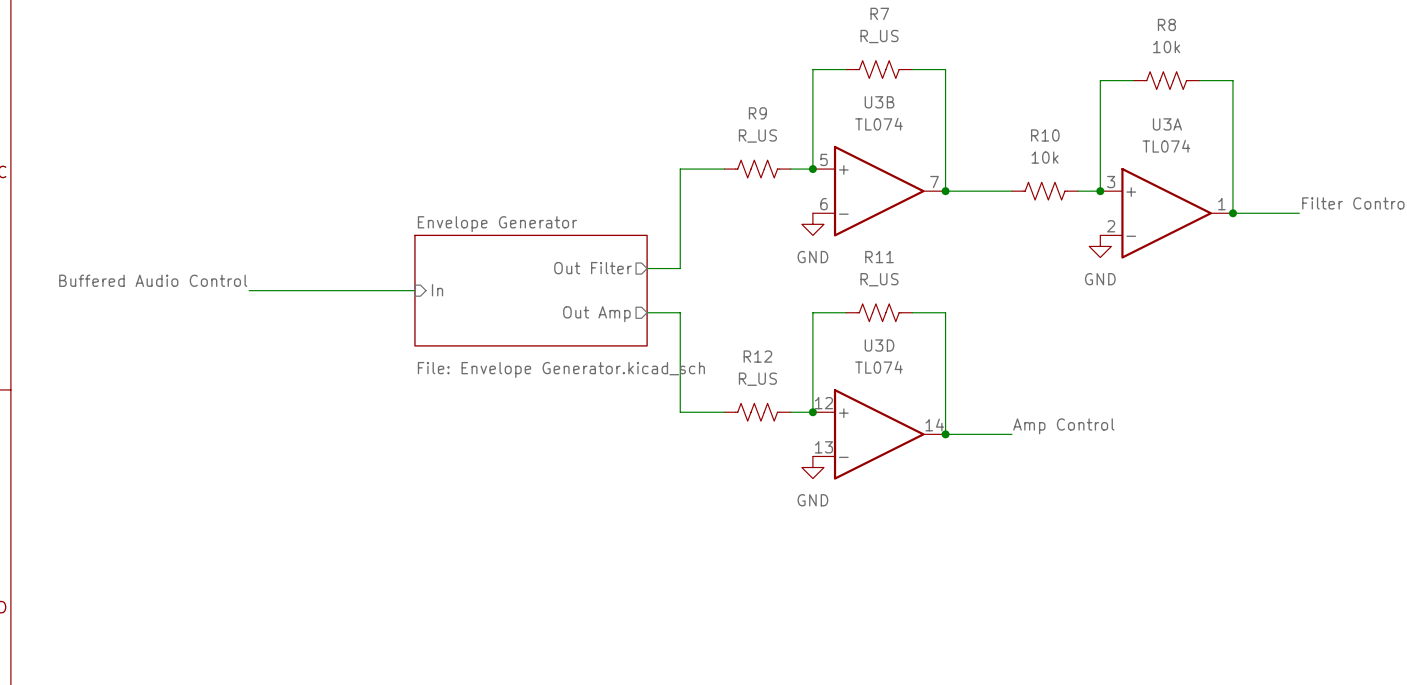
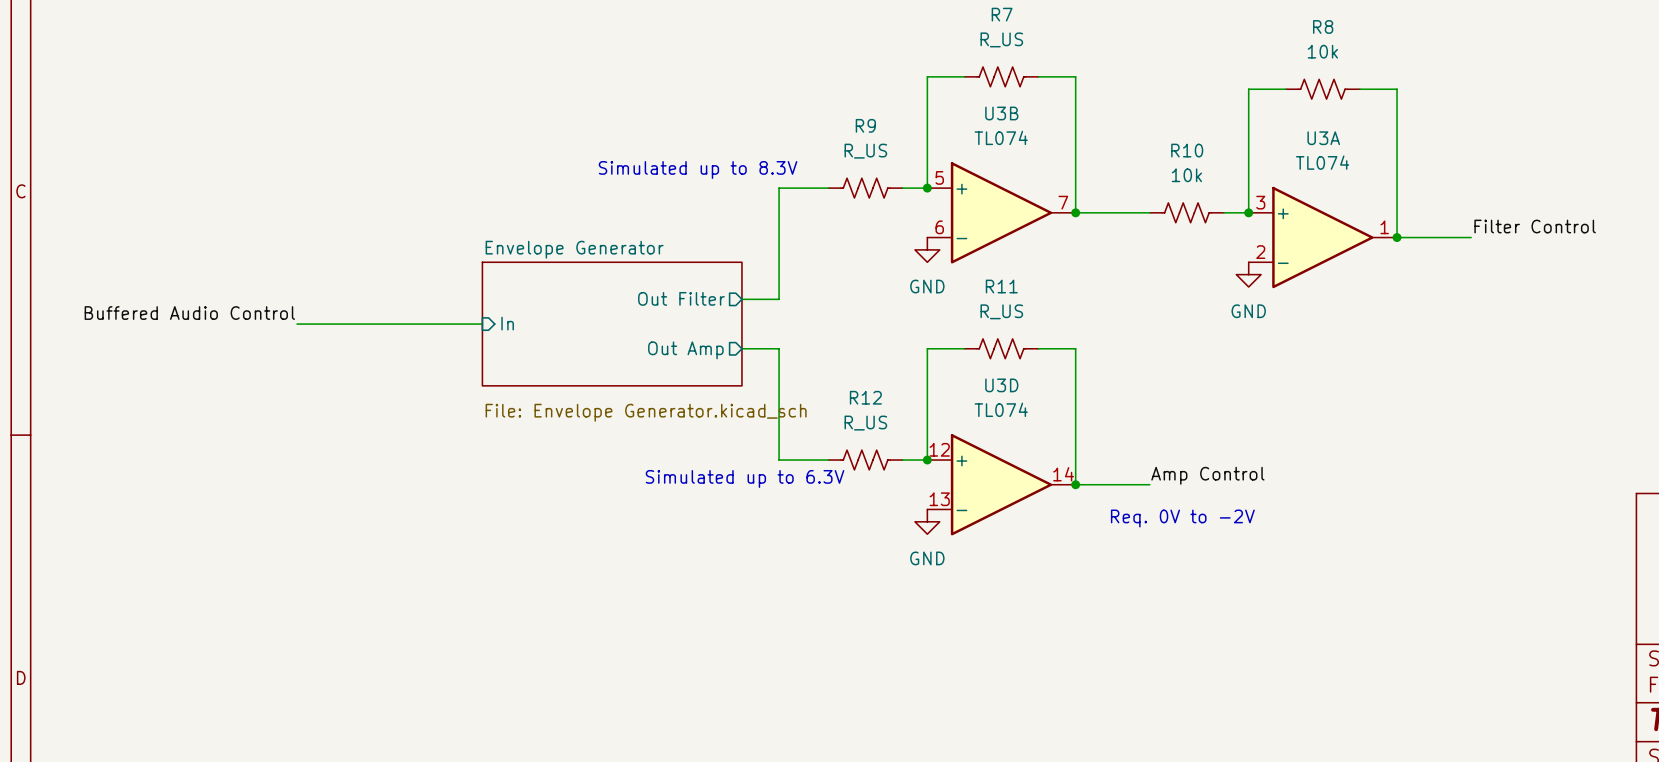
text: none -> Simulated up to 8.3V (698, 169)
text: none -> Simulated up to 6.3V (745, 478)
text: none -> Req. 0V to -2V (1182, 518)

